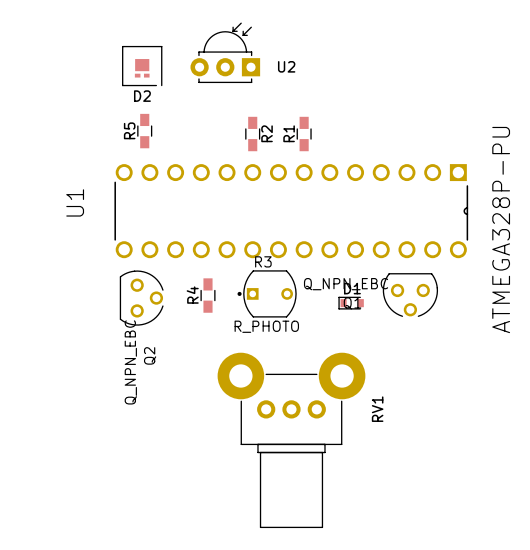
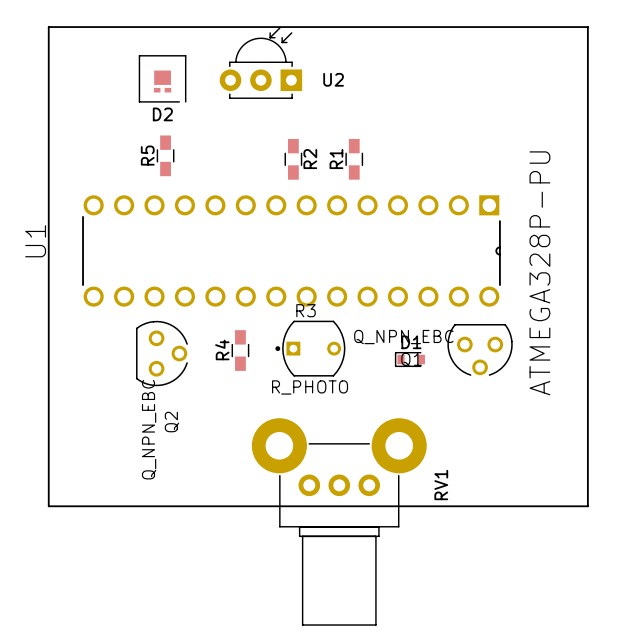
board edge: none -> (48, 27) (587, 27) (587, 506) (48, 506) (48, 27)
U1 position: (291, 211) -> (291, 250)

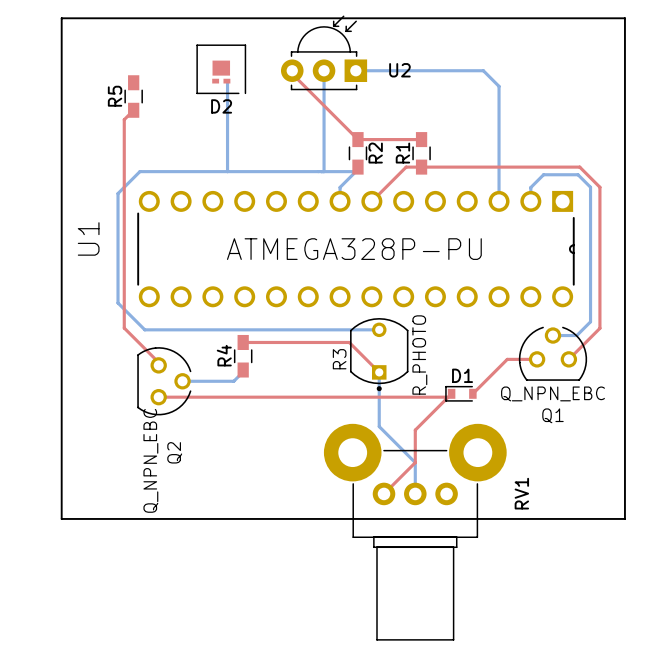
U2 position: (260, 63) -> (324, 52)
top track: none -> (292, 70) (292, 73) (357, 139) (421, 139)
bottom track: none -> (324, 70) (324, 171)
bottom track: none -> (355, 70) (483, 70) (499, 86) (499, 201)
D2 position: (162, 78) -> (221, 69)
bottom track: none -> (227, 80) (227, 171)
top track: none -> (133, 110) (124, 119) (124, 328) (158, 362) (158, 365)
R5 position: (165, 155) -> (133, 96)
R2 position: (293, 159) -> (357, 153)
R1 position: (354, 159) -> (421, 153)
bottom track: none -> (340, 201) (340, 187) (355, 171) (139, 171) (118, 193) (118, 303) (144, 329) (379, 329)
top track: none -> (371, 201) (406, 167) (579, 167) (599, 187) (599, 328) (568, 359)
bottom track: none -> (532, 201) (530, 201) (530, 187) (543, 174) (578, 174) (590, 187) (590, 321) (576, 335) (552, 335)
U1 position: (291, 250) -> (355, 249)
U1 value rotation: 0° (539, 273) -> 90° clockwise (354, 249)
top track: none -> (243, 342) (349, 342) (379, 372)
Q1 value position: Q_NPN_EBC (403, 337) -> Q_NPN_EBC (552, 393)
R3 rotation: 0° (310, 348) -> 90° counterclockwise (379, 354)
R3 position: (310, 348) -> (379, 354)
Q1 rotation: 0° (480, 349) -> 180° (552, 353)
R4 position: (240, 350) -> (243, 356)
Q2 position: (161, 353) -> (164, 381)
top track: none -> (537, 359) (507, 359) (472, 393)
D1 position: (409, 359) -> (460, 393)
Q1 name position: Q1 (411, 359) -> Q1 (552, 415)
bottom track: none -> (243, 371) (233, 381) (182, 381)
bottom track: none -> (379, 372) (379, 426) (415, 462) (415, 493)
top track: none -> (158, 397) (448, 397) (415, 430) (415, 462) (384, 493)
RV1 position: (339, 521) -> (415, 532)

